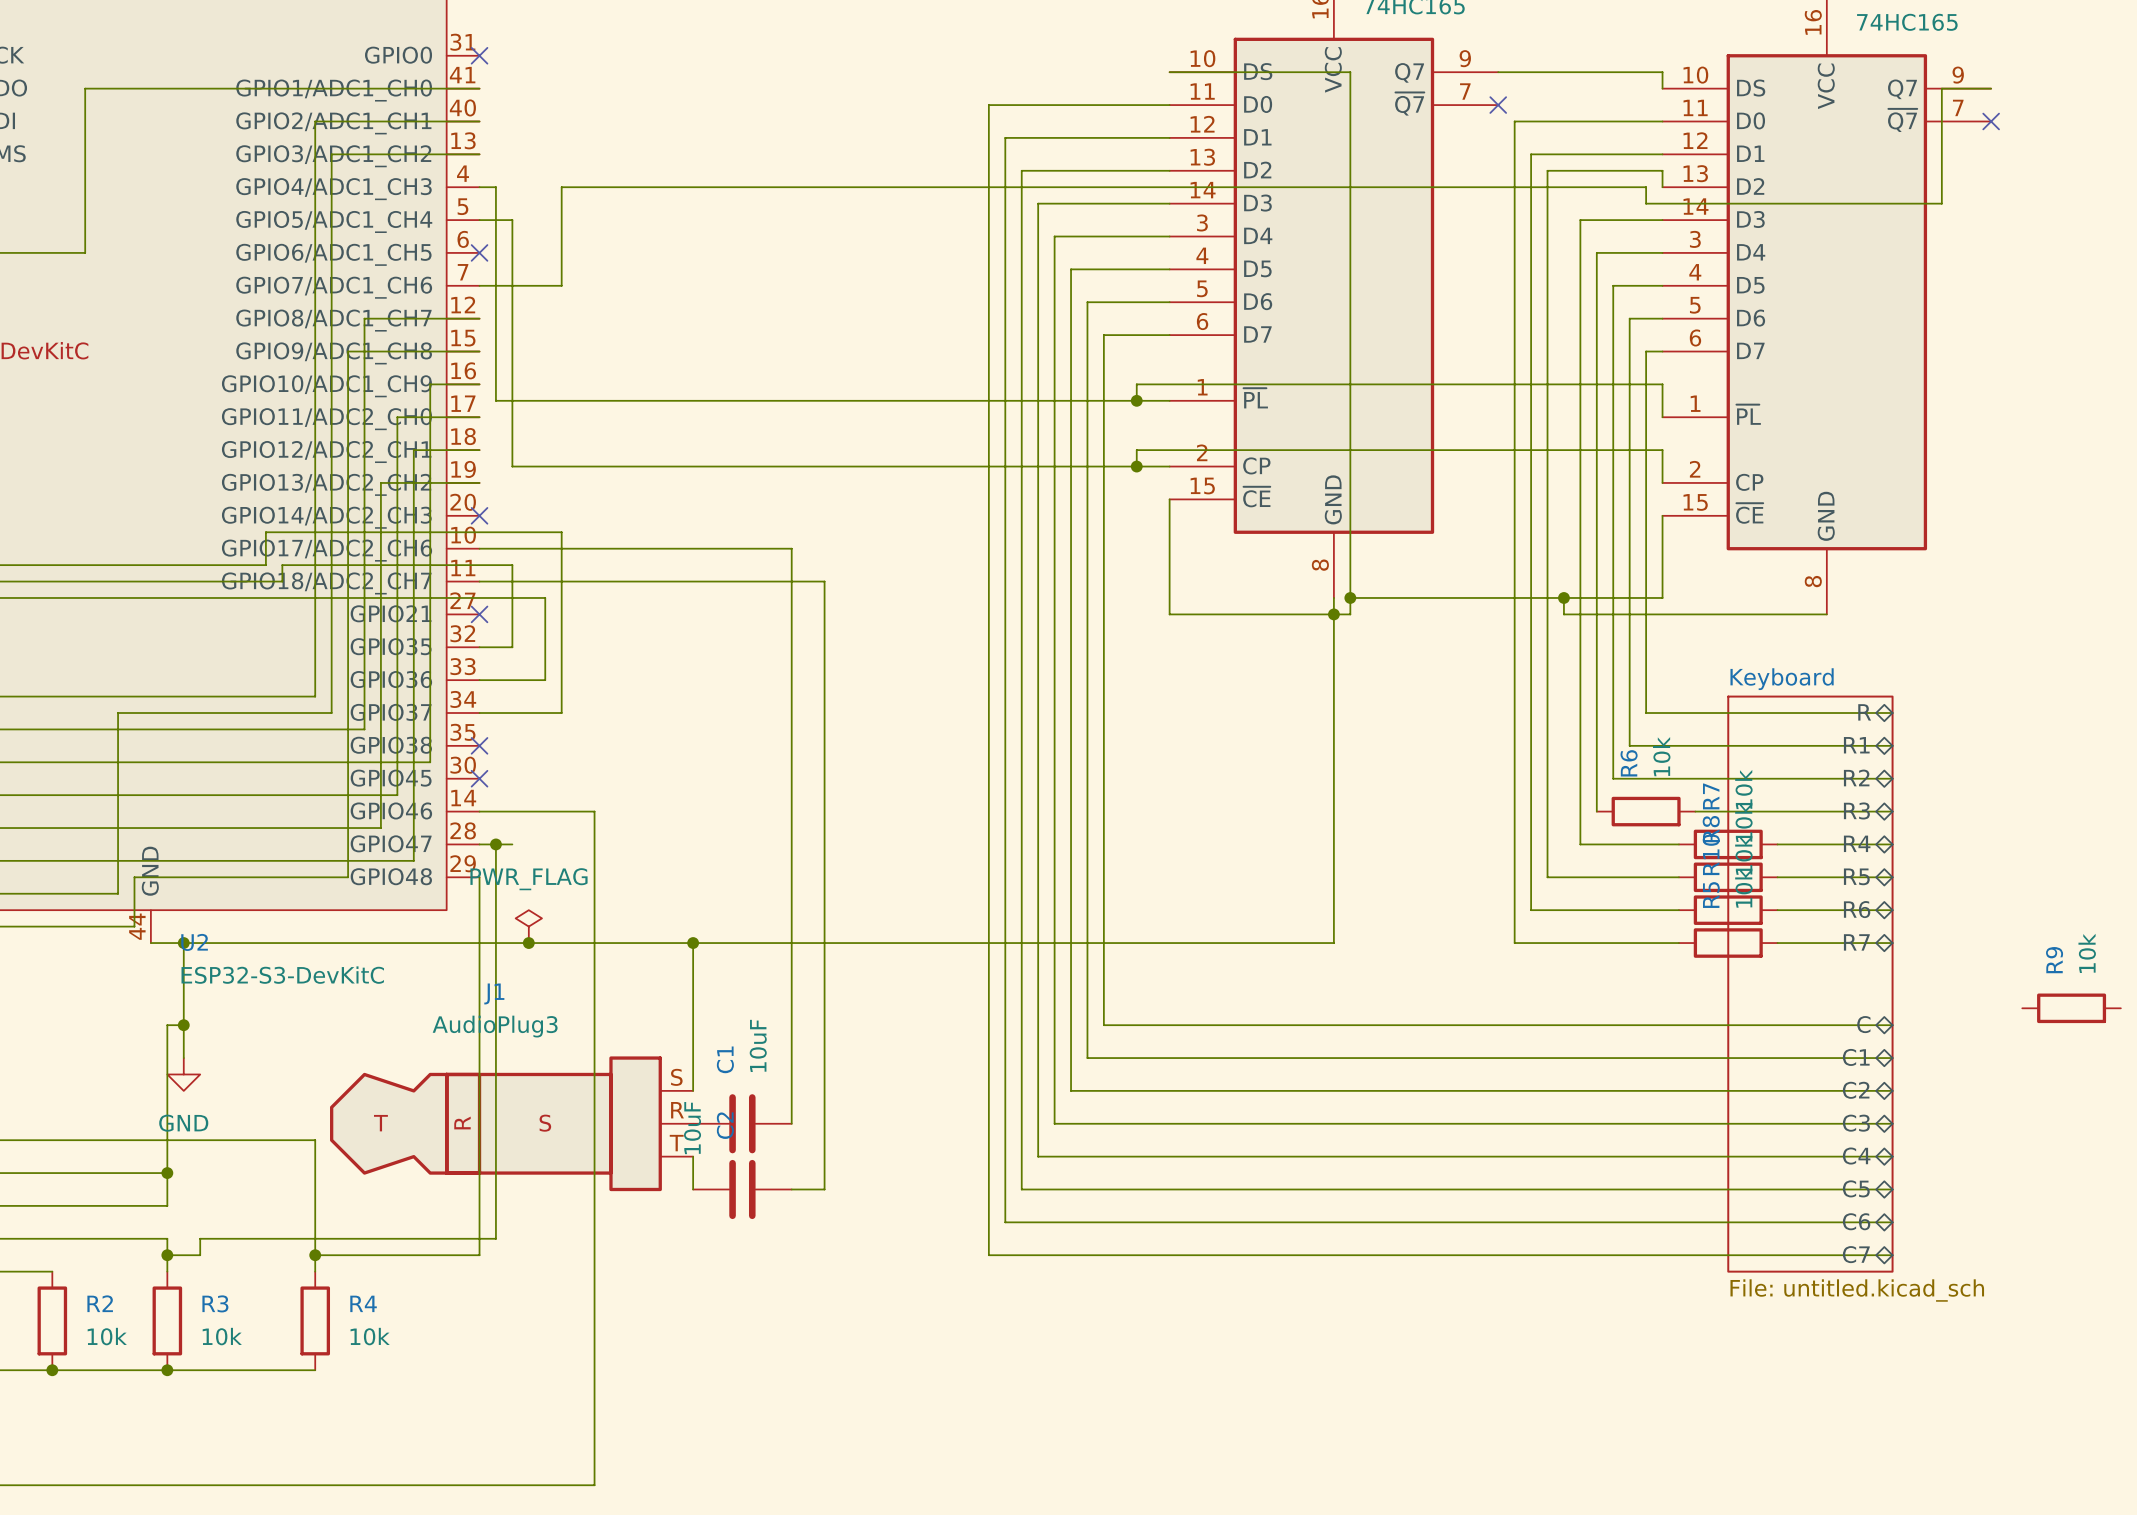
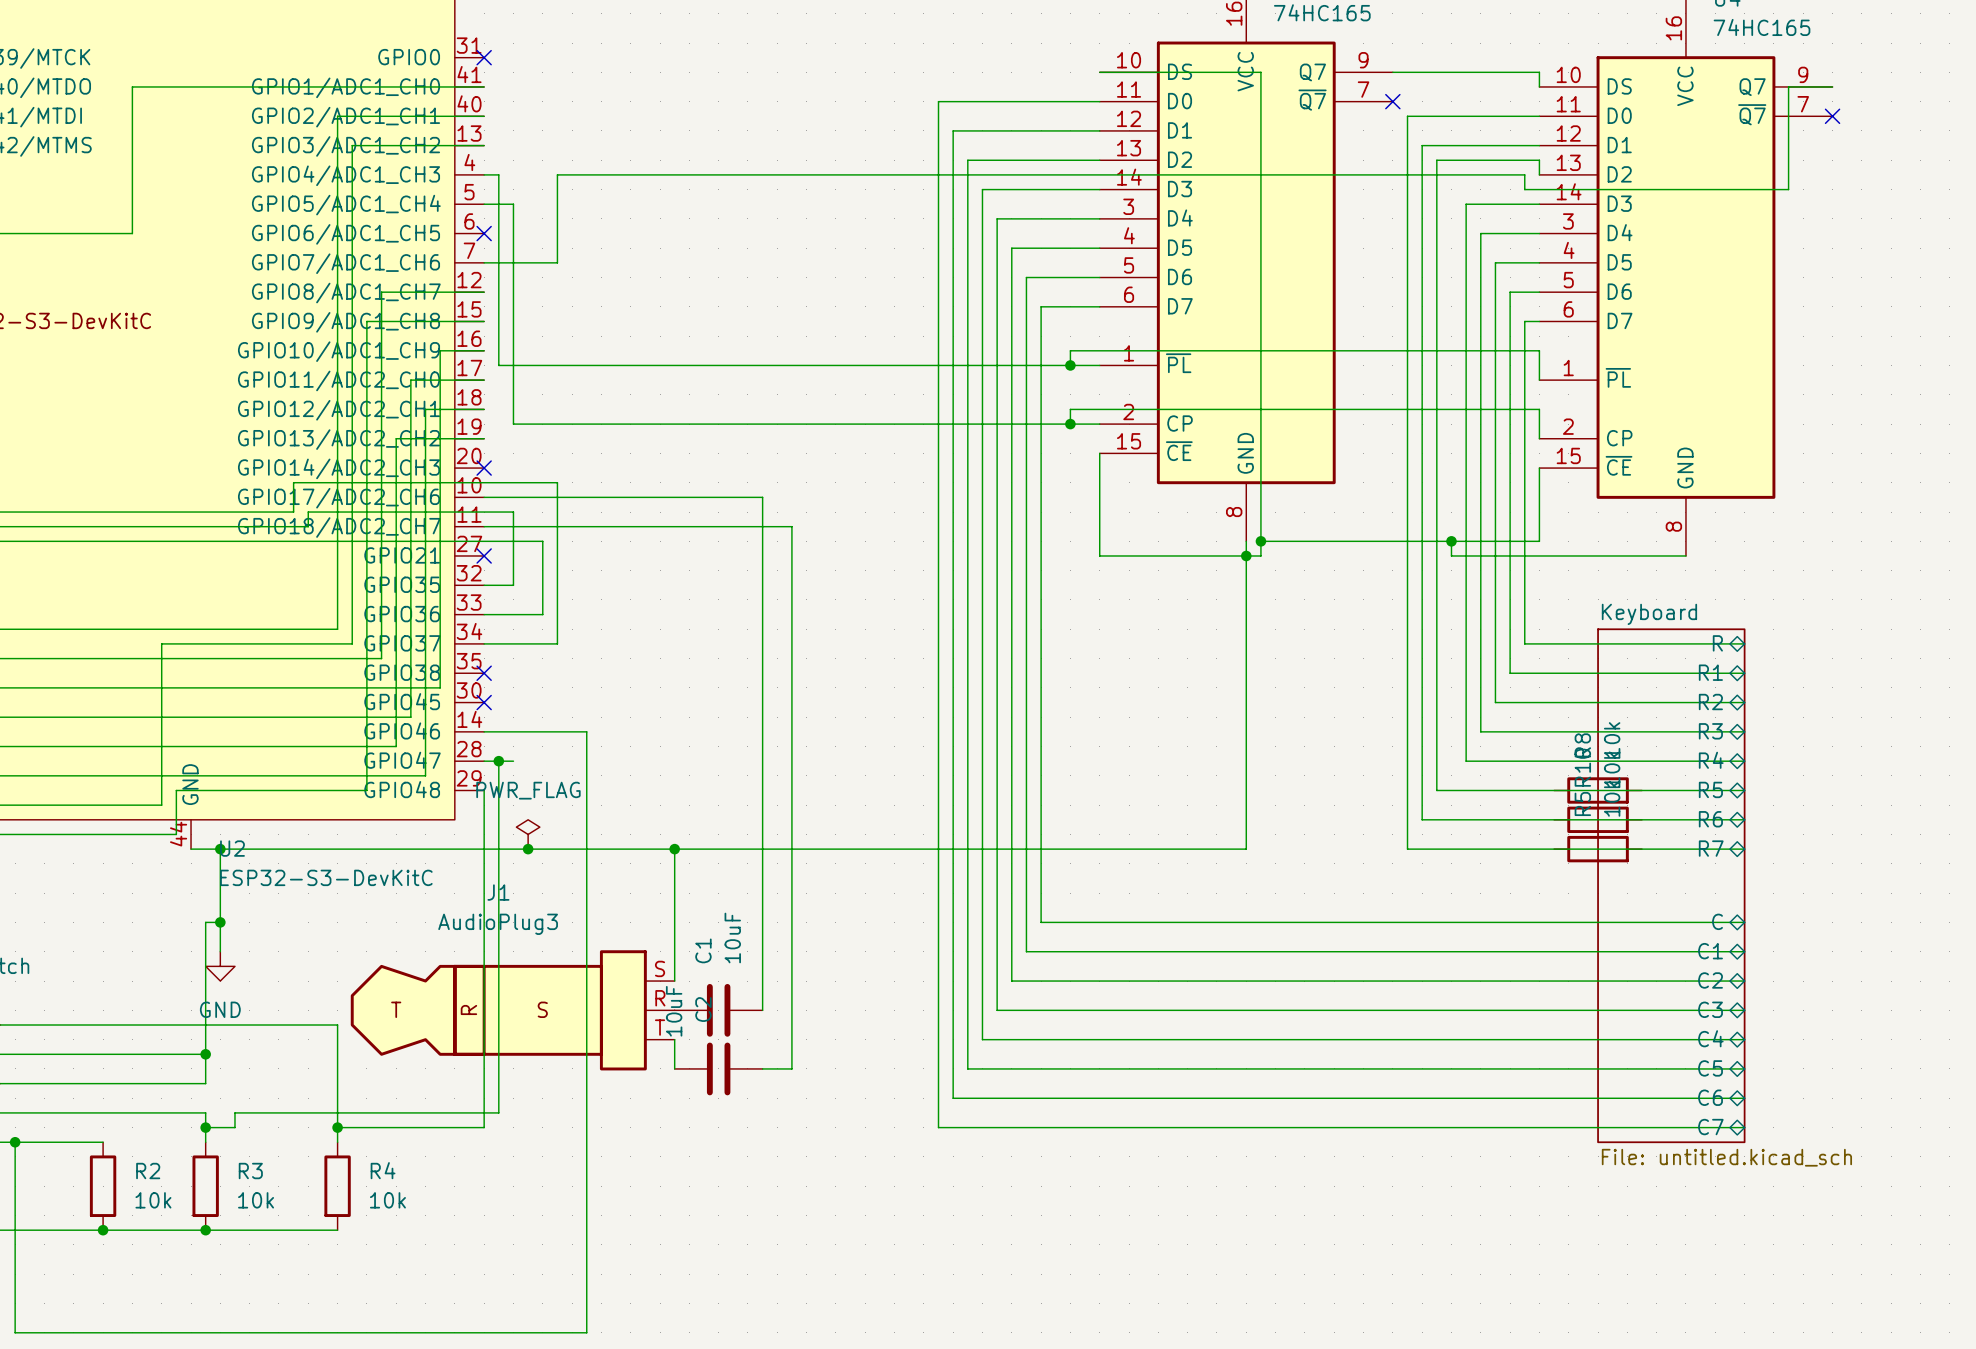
wire: none -> (1480, 731) (1568, 731)
R6: 10k (1646, 811) -> none
wire: none -> (1554, 761) (1642, 761)
R7: 10k (1728, 844) -> none
wire: none -> (1554, 790) (1642, 790)
wire: none -> (1554, 819) (1642, 819)
wire: none -> (1554, 849) (1642, 849)
R9: 10k (2071, 1008) -> none

